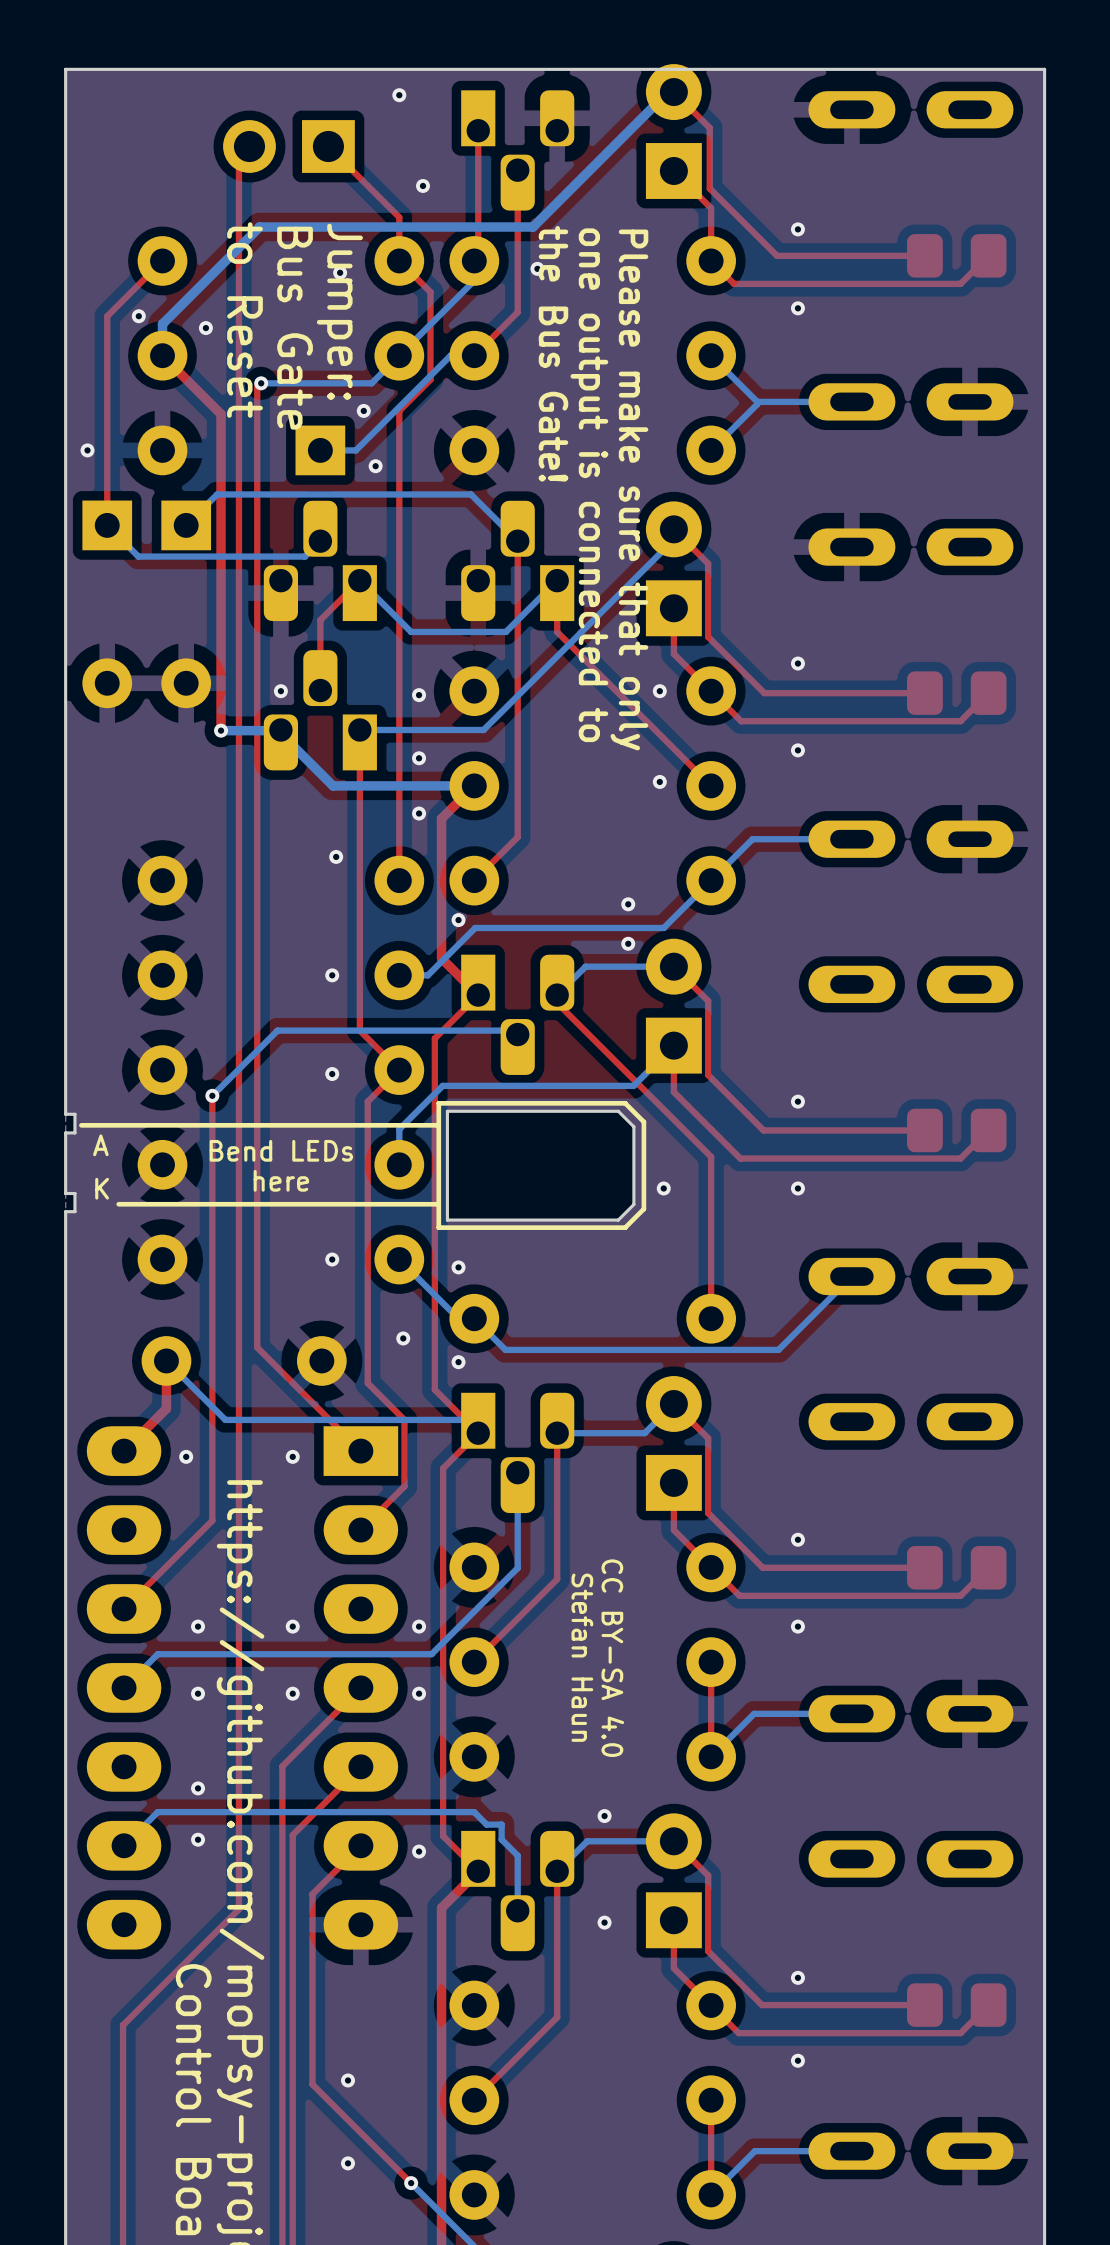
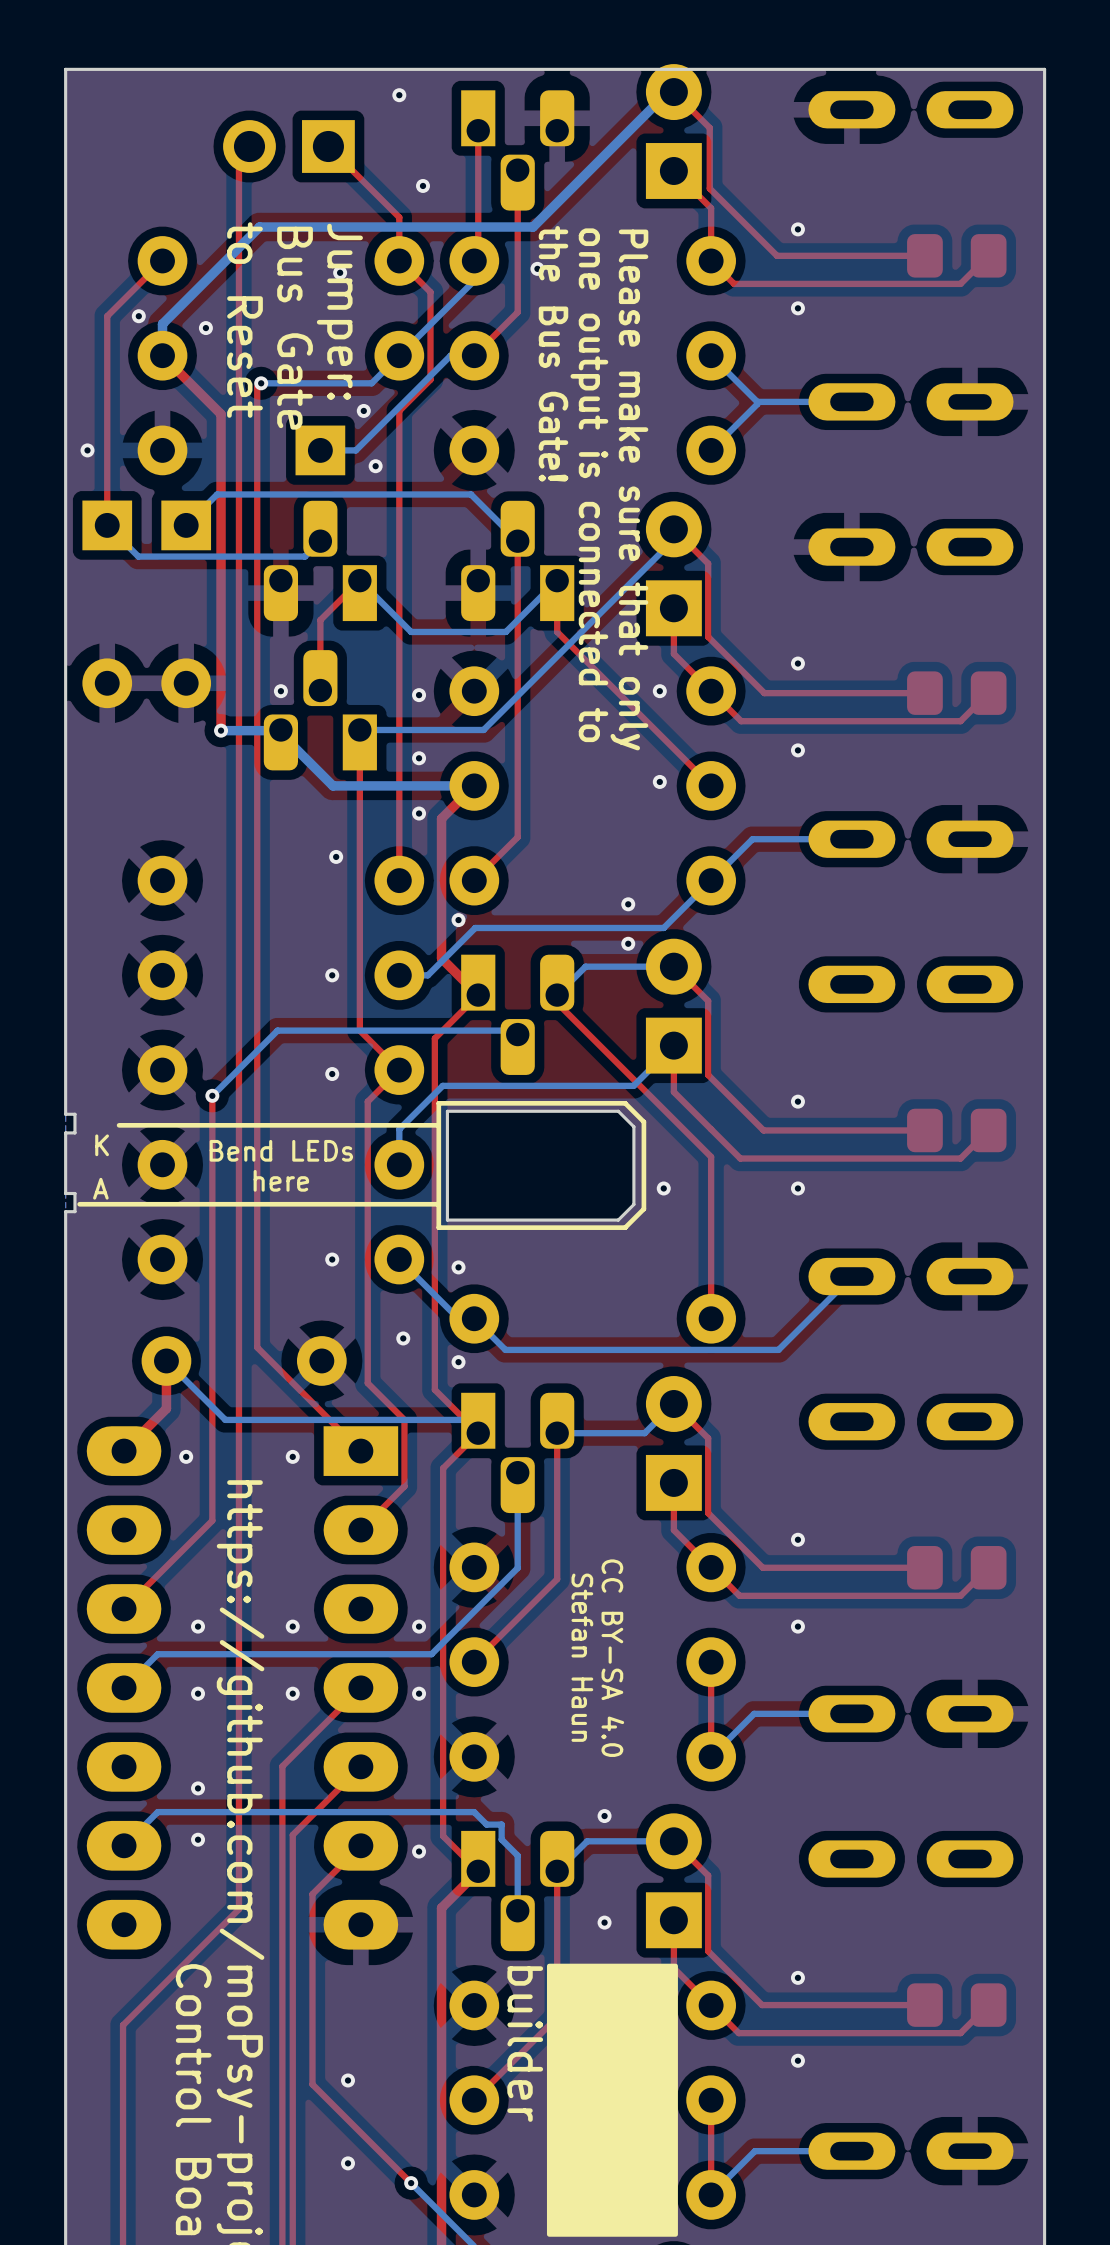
line: (119, 1125) (81, 1125) -> none
text: A (100, 1145) -> K (102, 1145)
text: K (102, 1188) -> A (100, 1188)
line: none -> (118, 1204) (79, 1204)
drawing: none -> [546, 1963, 678, 2237]
text: none -> builder (525, 2044)

